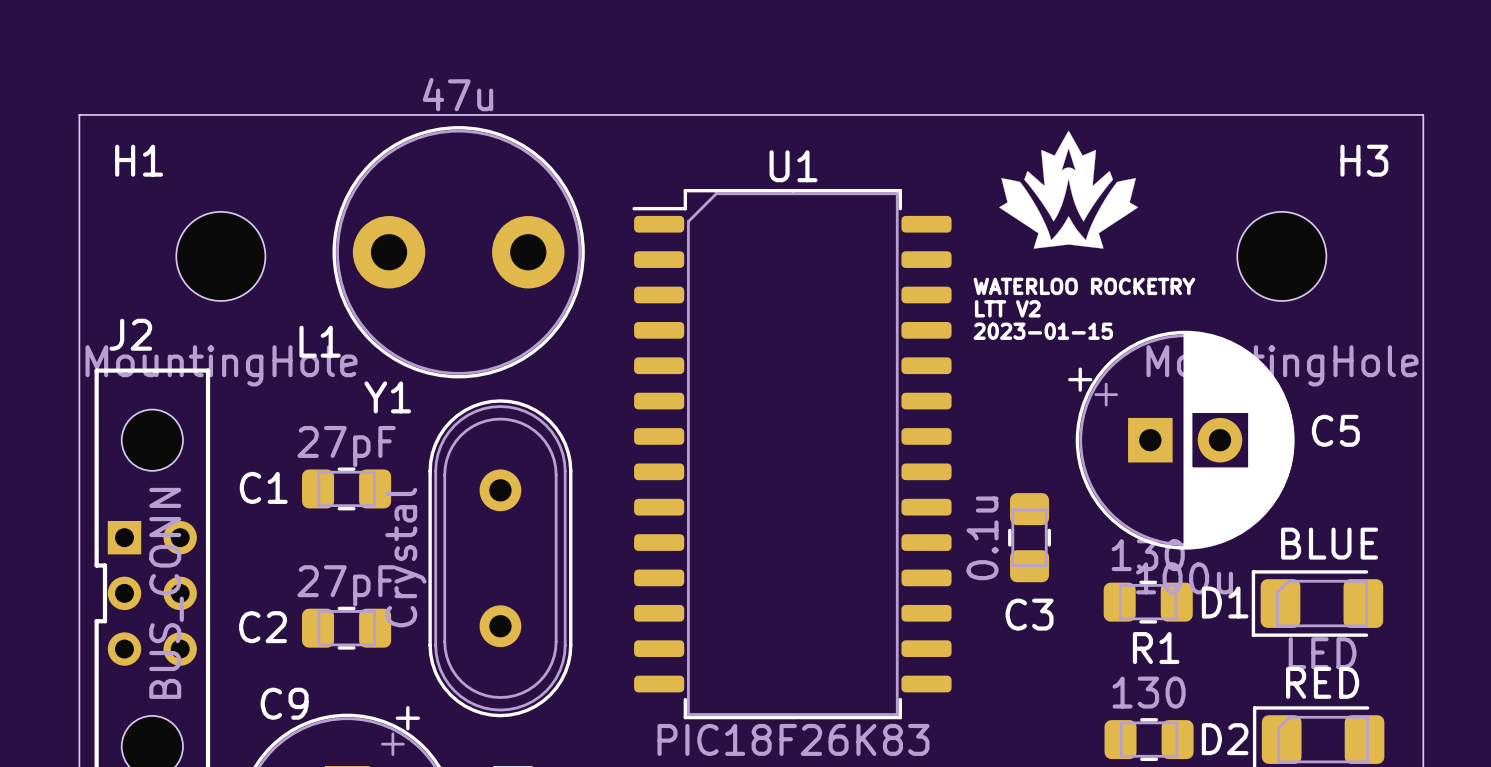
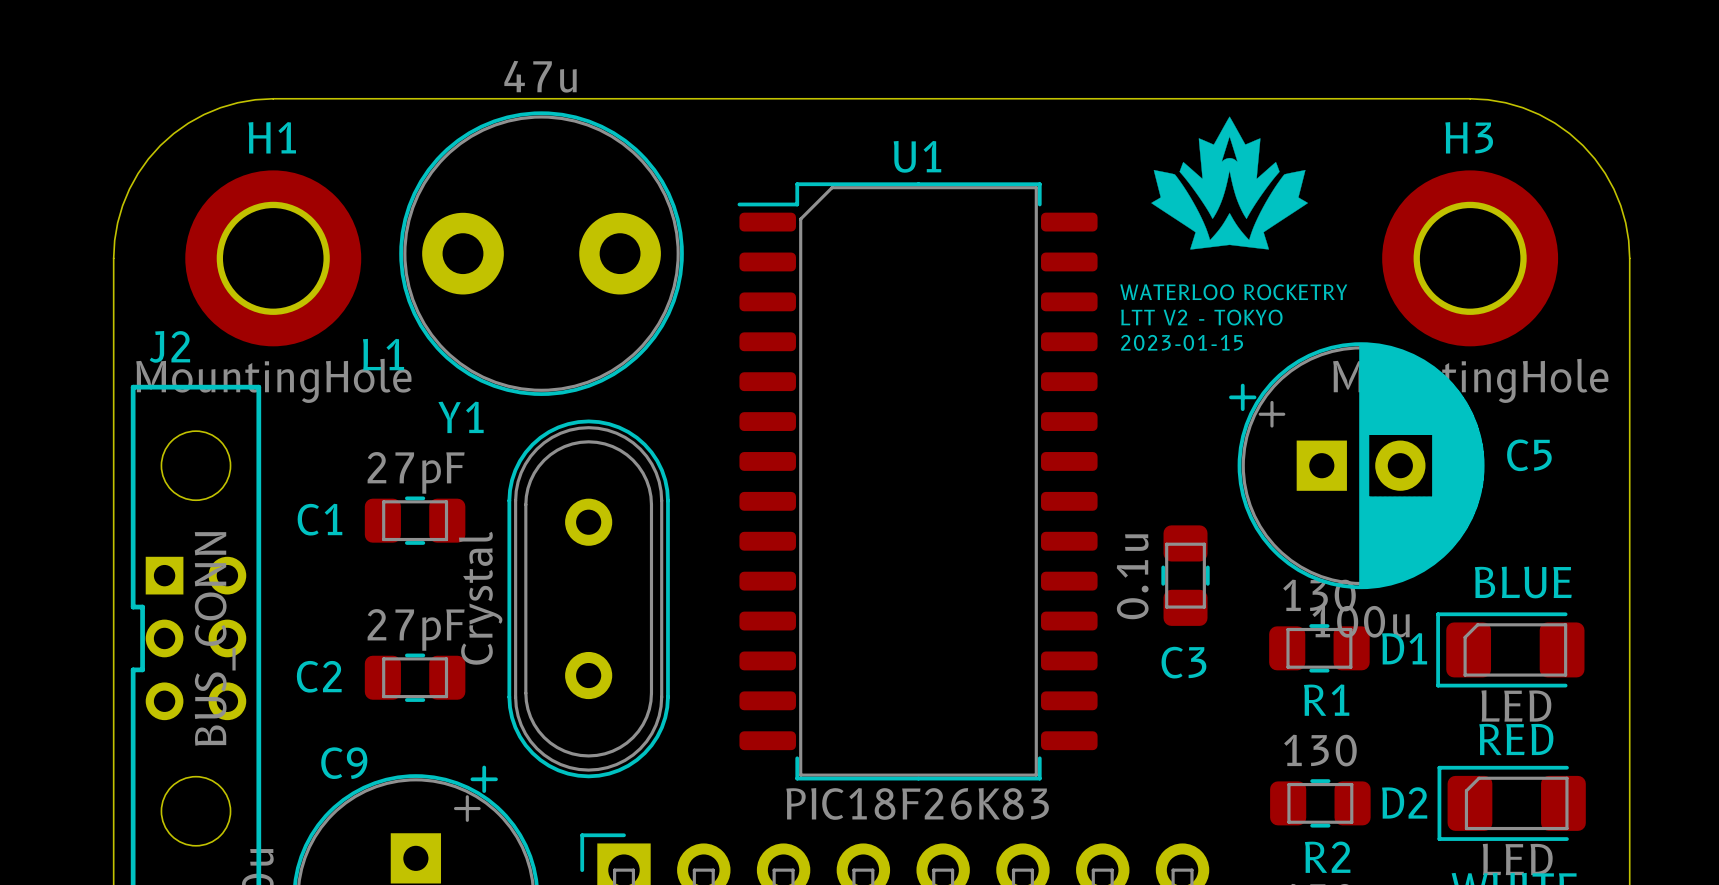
board edge: (220, 114) (79, 114) (79, 256) -> (273, 98) (237, 102) (204, 114) (188, 123) (160, 145) (138, 173) (122, 205) (117, 222) (113, 258)
board edge: (1281, 114) (1423, 114) (1423, 256) -> (1470, 98) (1505, 102) (1539, 114) (1555, 123) (1582, 145) (1594, 158) (1613, 189) (1625, 222) (1629, 258)
H1 name position: H1 (139, 160) -> H1 (272, 137)
H3 name position: H3 (1364, 160) -> H3 (1469, 137)
H1 footprint: [176, 211, 266, 301] -> [185, 170, 362, 347]
H3 footprint: [1237, 211, 1327, 301] -> [1382, 170, 1559, 347]
text: LTT V2 (1007, 308) -> LTT V2 - TOKYO (1201, 317)

